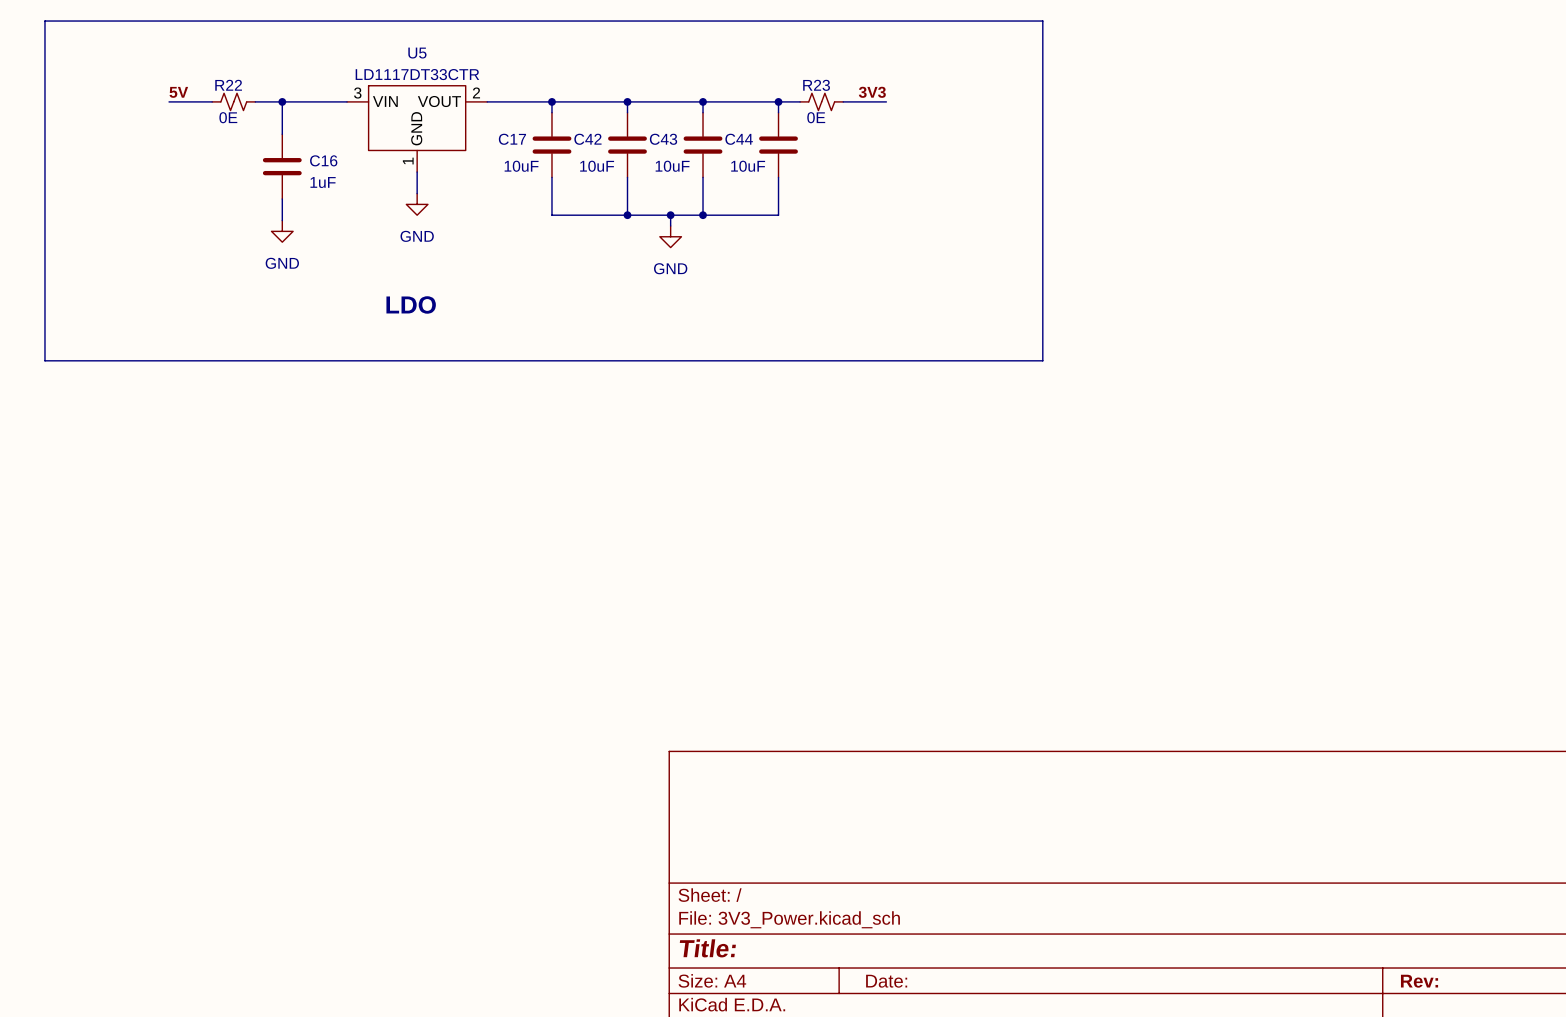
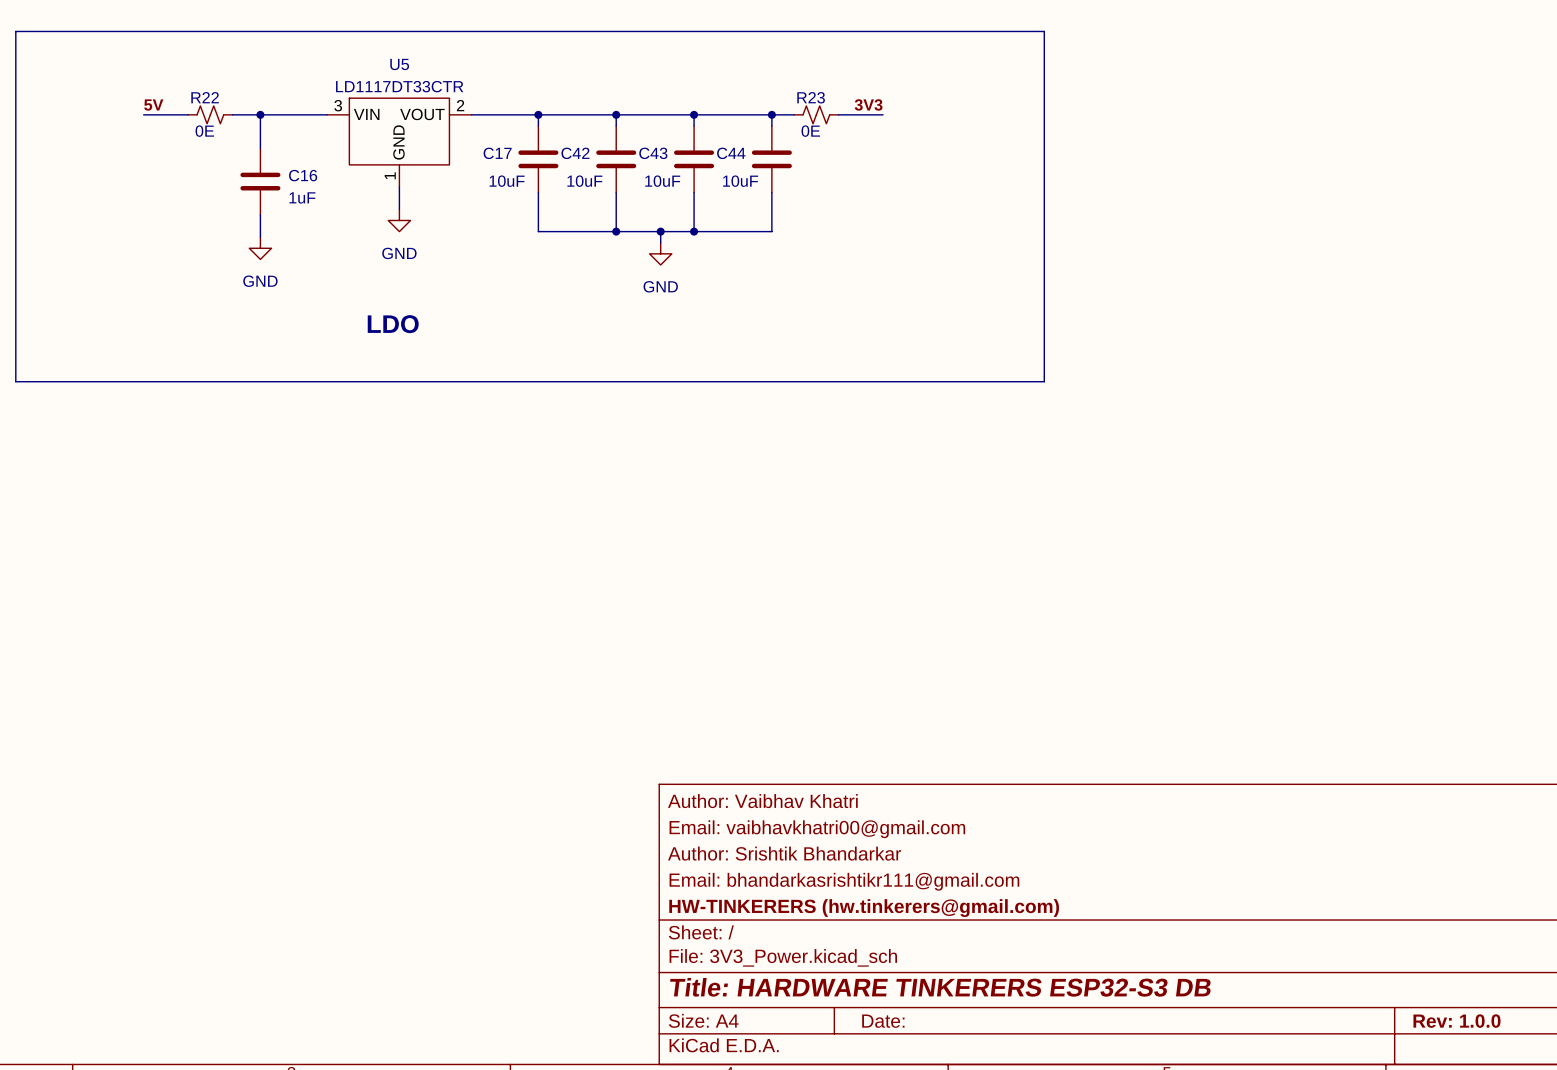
title block: none -> Author: Vaibhav Khatri (762, 801)
title block: none -> Email: vaibhavkhatri00@gmail.com (817, 829)
title block: none -> Author: Srishtik Bhandarkar (784, 853)
title block: none -> Email: bhandarkasrishtikr111@gmail.com (844, 881)
title block: none -> HW-TINKERERS (hw.tinkerers@gmail.com) (864, 908)
title block: Title: (707, 948) -> Title: HARDWARE TINKERERS ESP32-S3 DB (940, 987)
title block: Rev: (1419, 981) -> Rev: 1.0.0 (1457, 1021)

